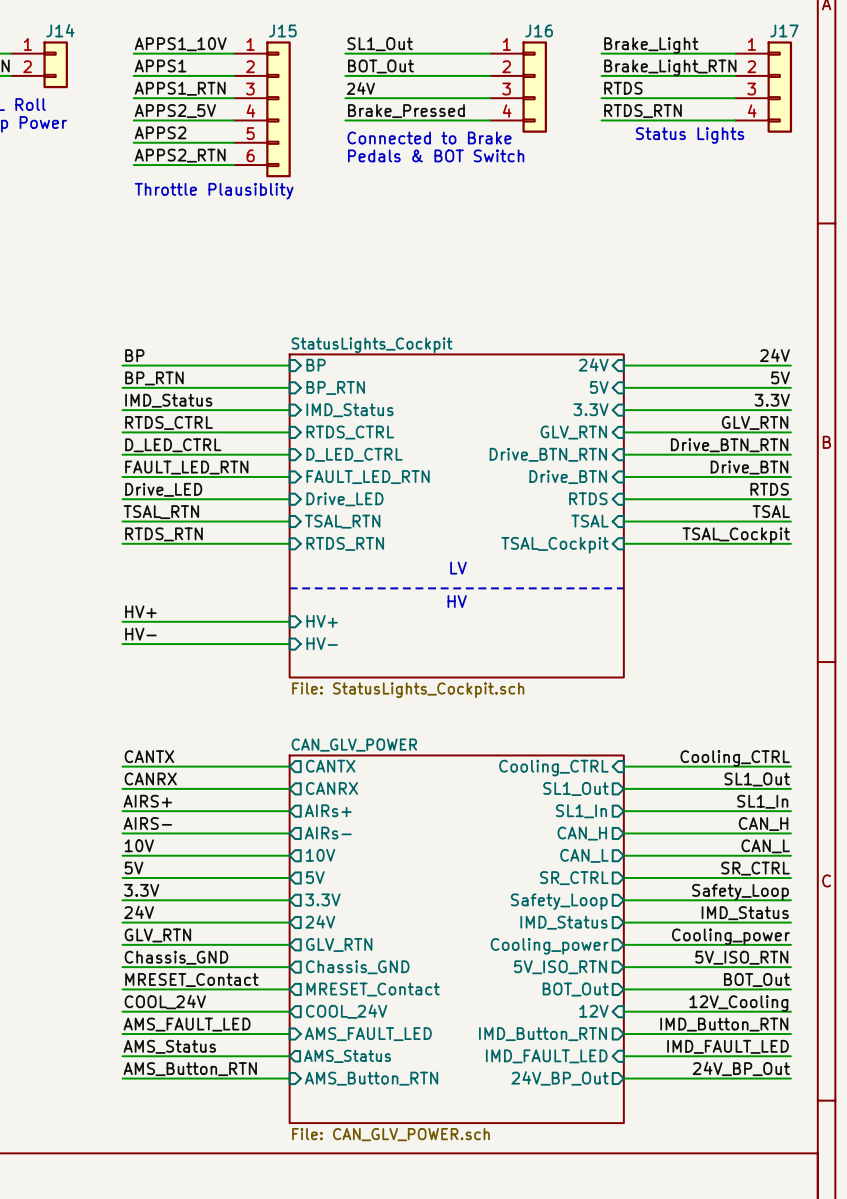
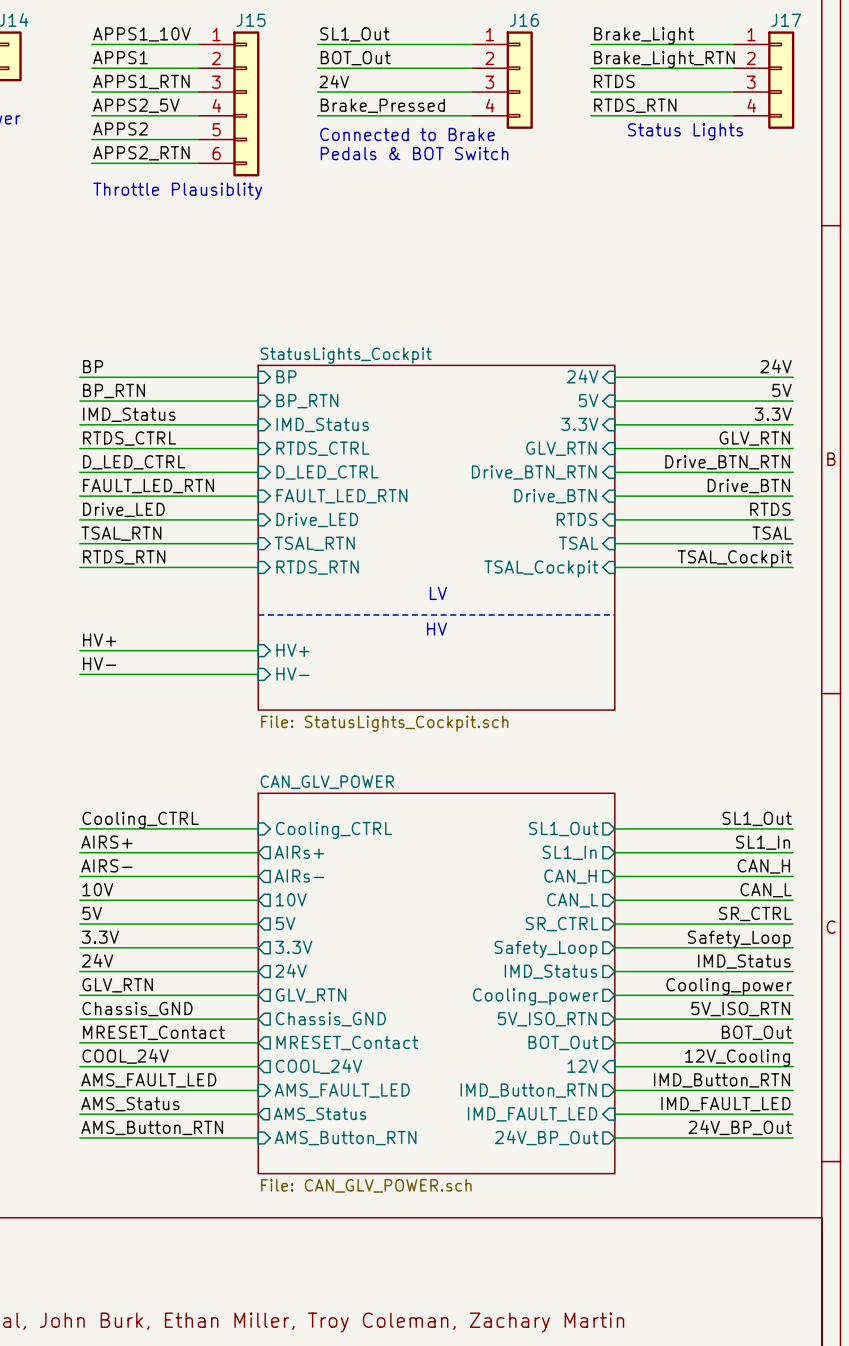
sheet CAN_GLV_POWER shape: [289, 755, 624, 1124] -> [258, 793, 615, 1174]
label: CANTX (149, 756) -> none
label: Cooling_CTRL (735, 758) -> none
wire: (122, 766) (289, 766) -> none
sheet pin: CANTX (330, 766) -> none
wire: (623, 766) (790, 766) -> none
sheet pin: Cooling_CTRL (553, 768) -> none
label: CANRX (150, 778) -> Cooling_CTRL (140, 820)
sheet pin shape: output (331, 788) -> input (333, 830)
sheet pin: CANRX (331, 788) -> Cooling_CTRL (333, 830)

